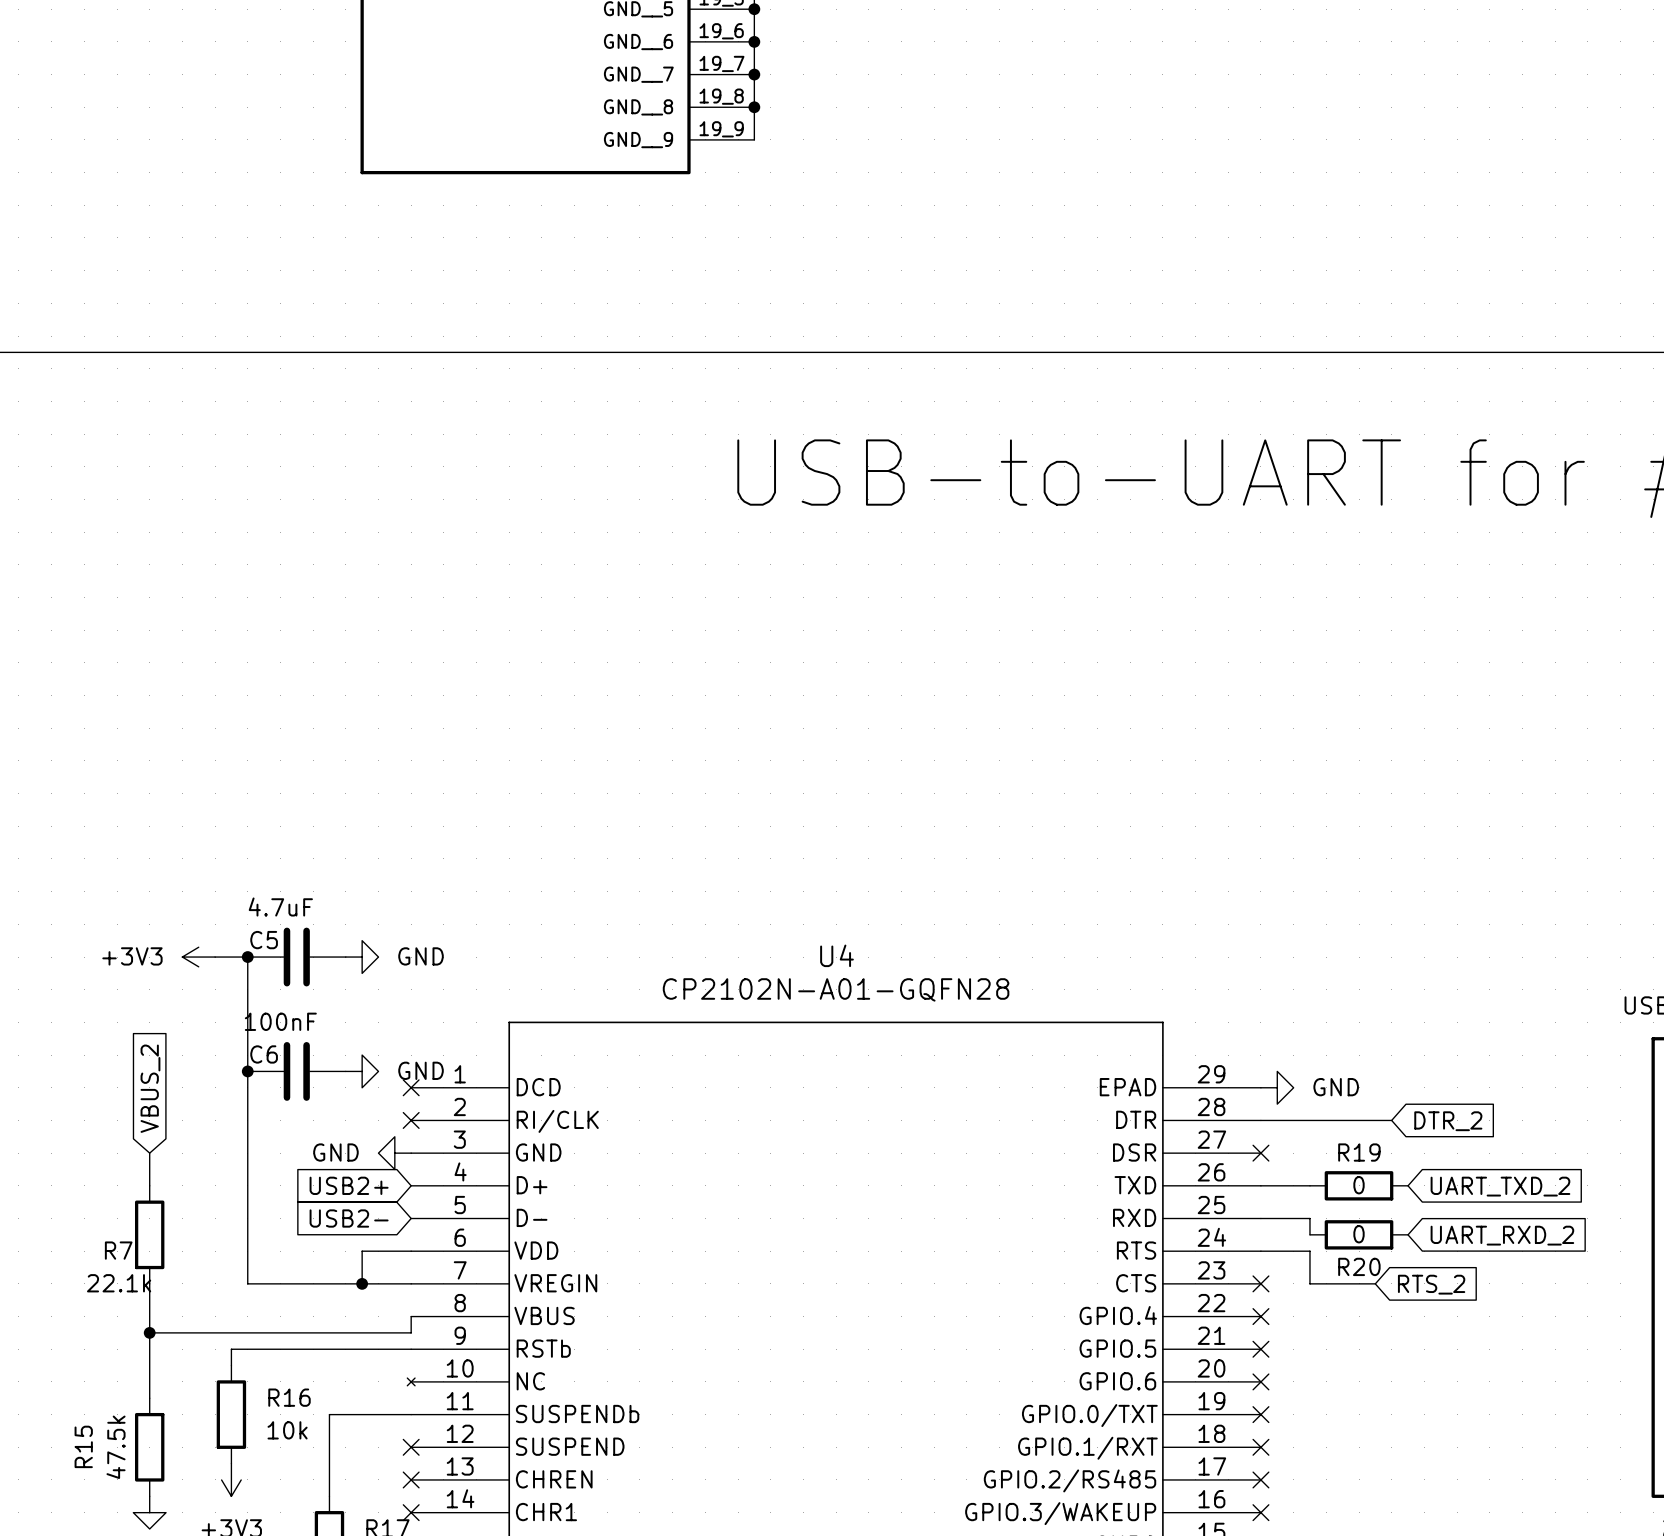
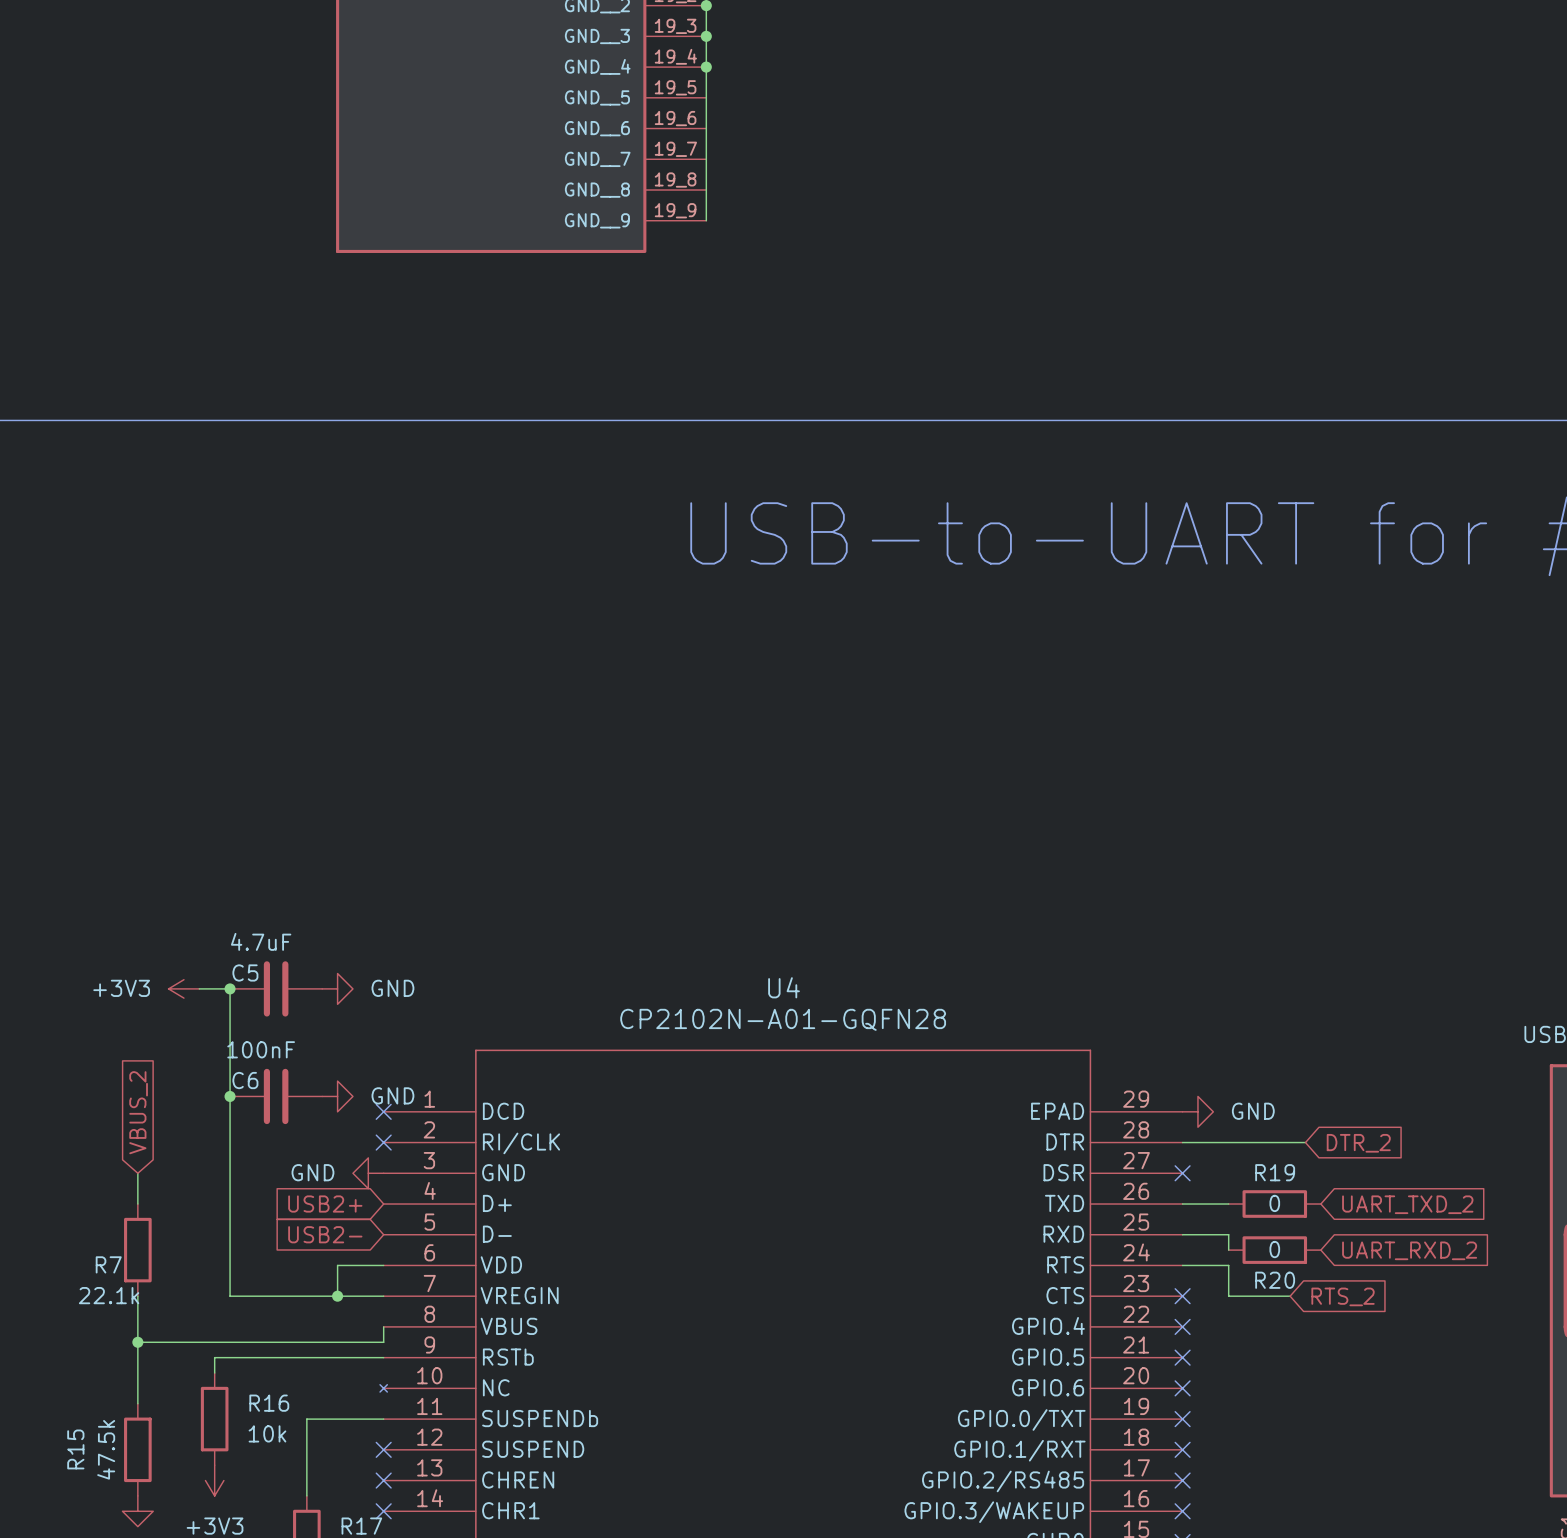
junction: (754, 9) -> none
junction: (754, 41) -> none
junction: (754, 74) -> none
junction: (754, 107) -> none

